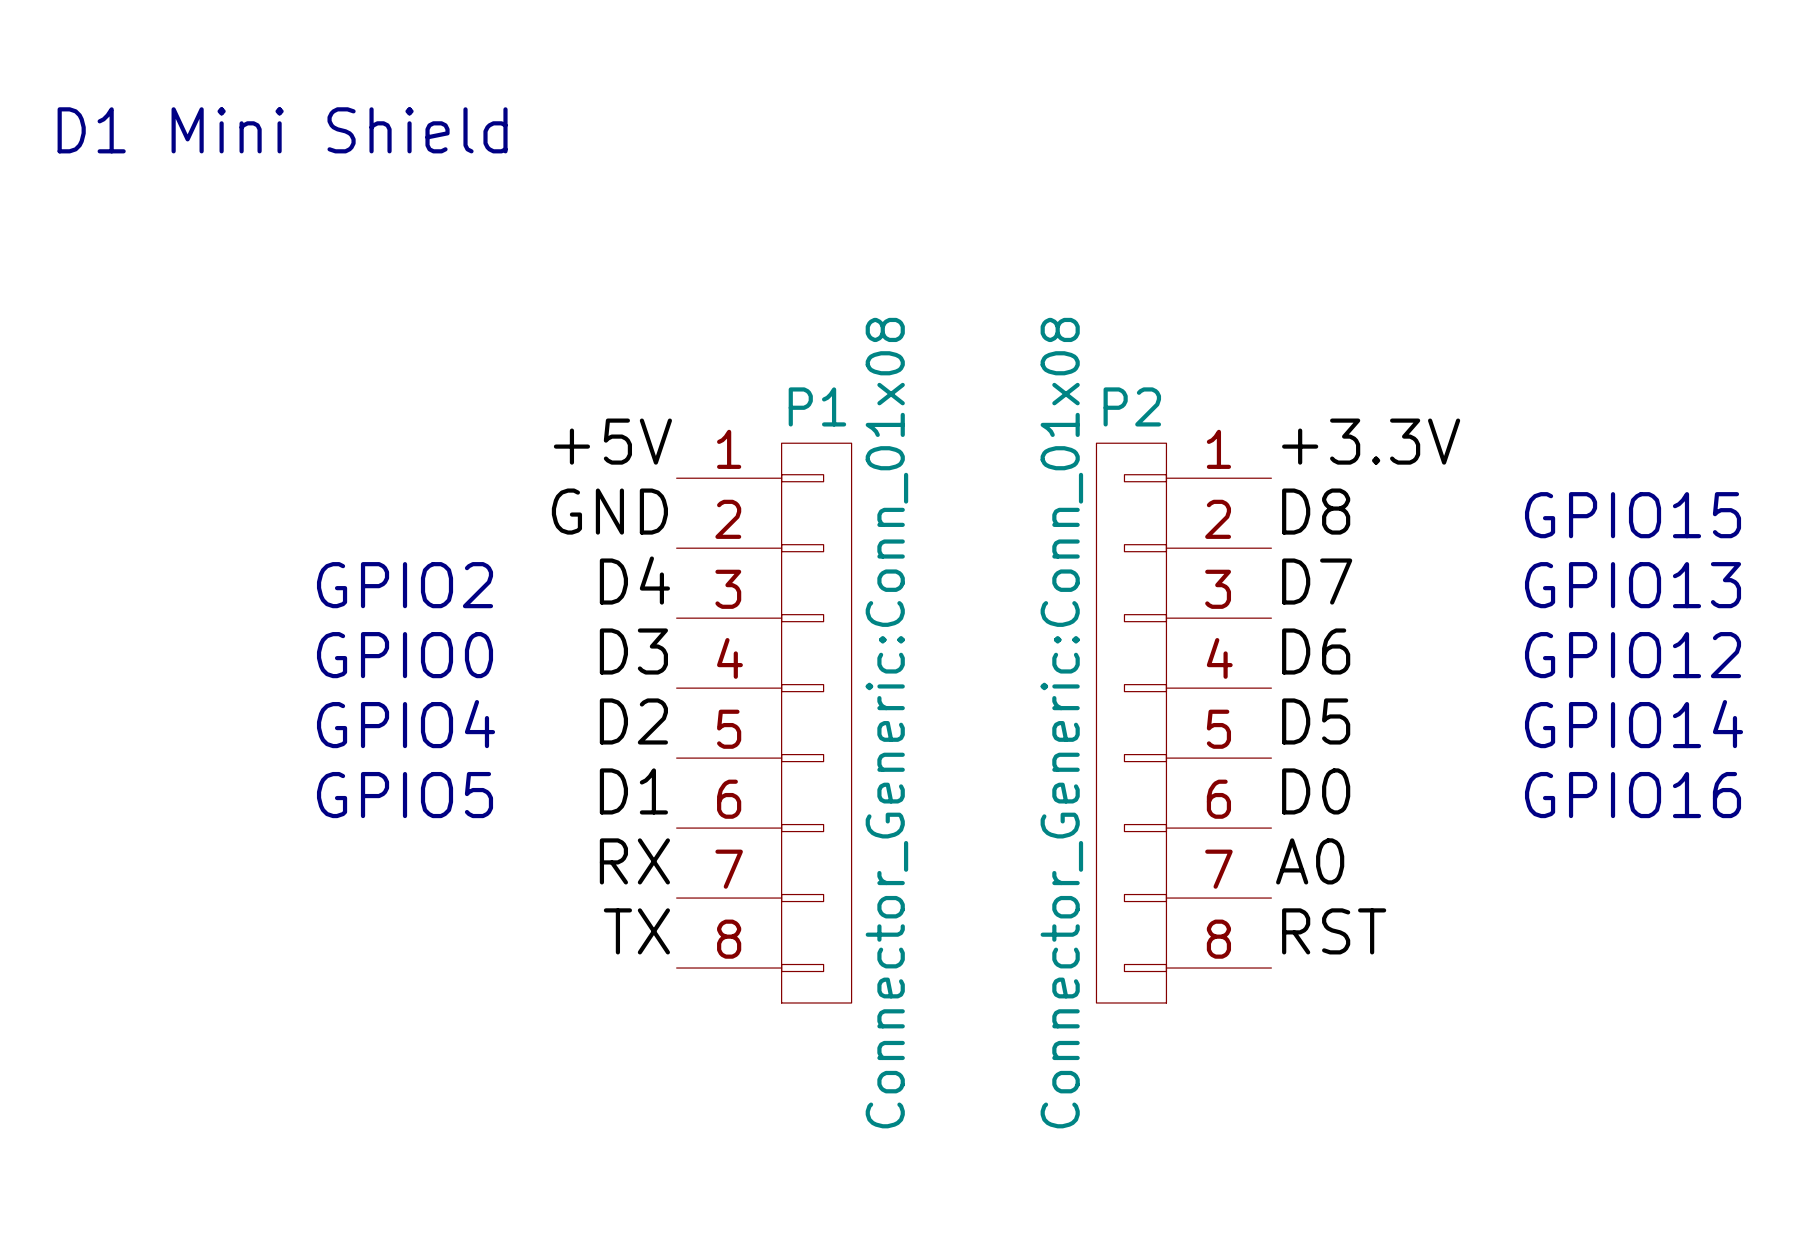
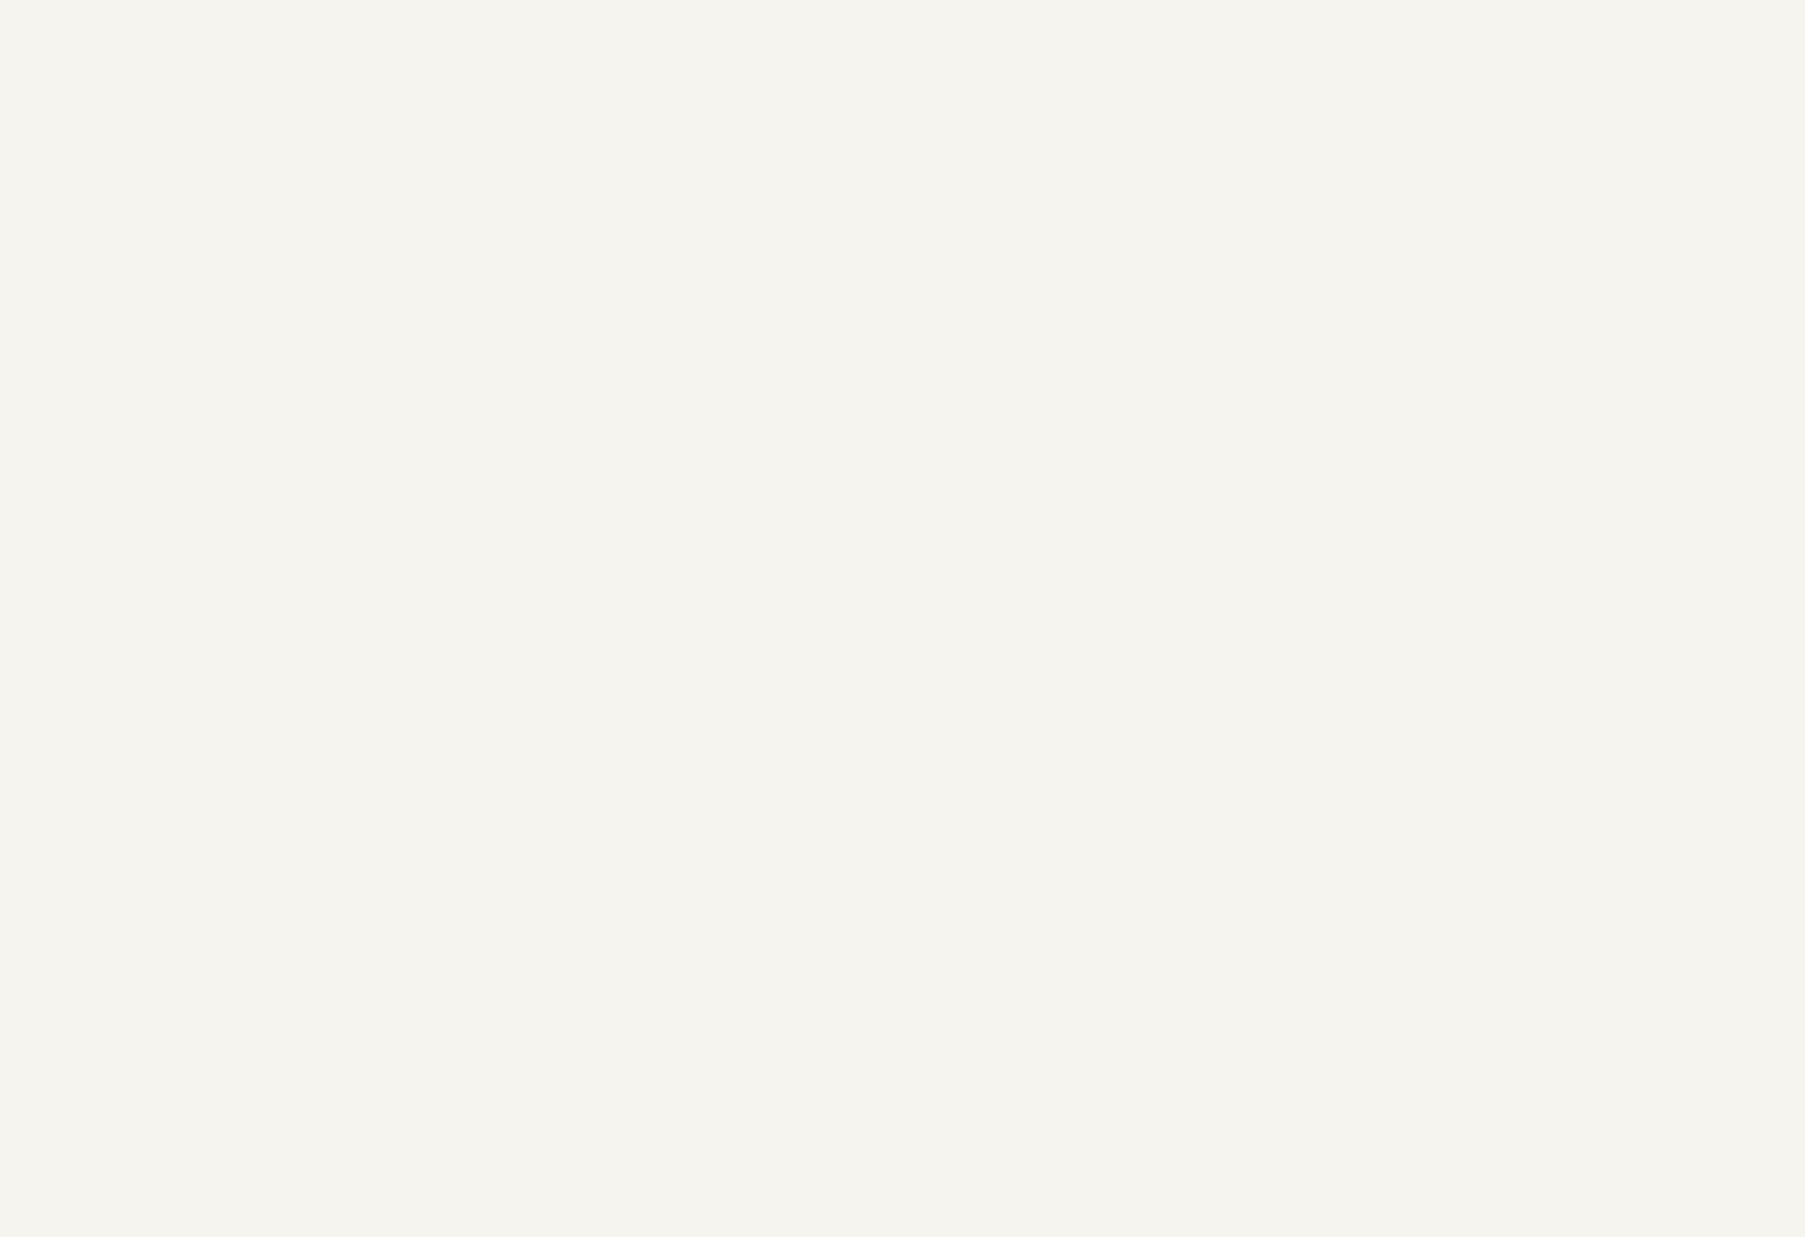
text: D1 Mini Shield (282, 130) -> none
label: +5V (612, 441) -> none
label: +3.3V (1371, 441) -> none
label: GND (609, 511) -> none
label: D8 (1316, 511) -> none
text: GPIO15 (1633, 515) -> none
label: D4 (634, 580) -> none
label: D7 (1317, 581) -> none
text: GPIO2 (405, 585) -> none
text: GPIO13 (1633, 585) -> none
label: D3 (633, 651) -> none
label: D6 (1316, 651) -> none
text: GPIO0 (405, 655) -> none
text: GPIO12 (1633, 655) -> none
label: D2 (633, 721) -> none
label: D5 (1316, 721) -> none
P1: Connector_Generic:Conn_01x08 (764, 723) -> none
P2: Connector_Generic:Conn_01x08 (1183, 723) -> none
text: GPIO4 (406, 724) -> none
text: GPIO14 (1634, 724) -> none
label: D1 (633, 791) -> none
label: D0 (1316, 791) -> none
text: GPIO5 (405, 795) -> none
text: GPIO16 (1633, 795) -> none
label: RX (634, 861) -> none
label: A0 (1310, 861) -> none
label: TX (636, 931) -> none
label: RST (1334, 931) -> none

